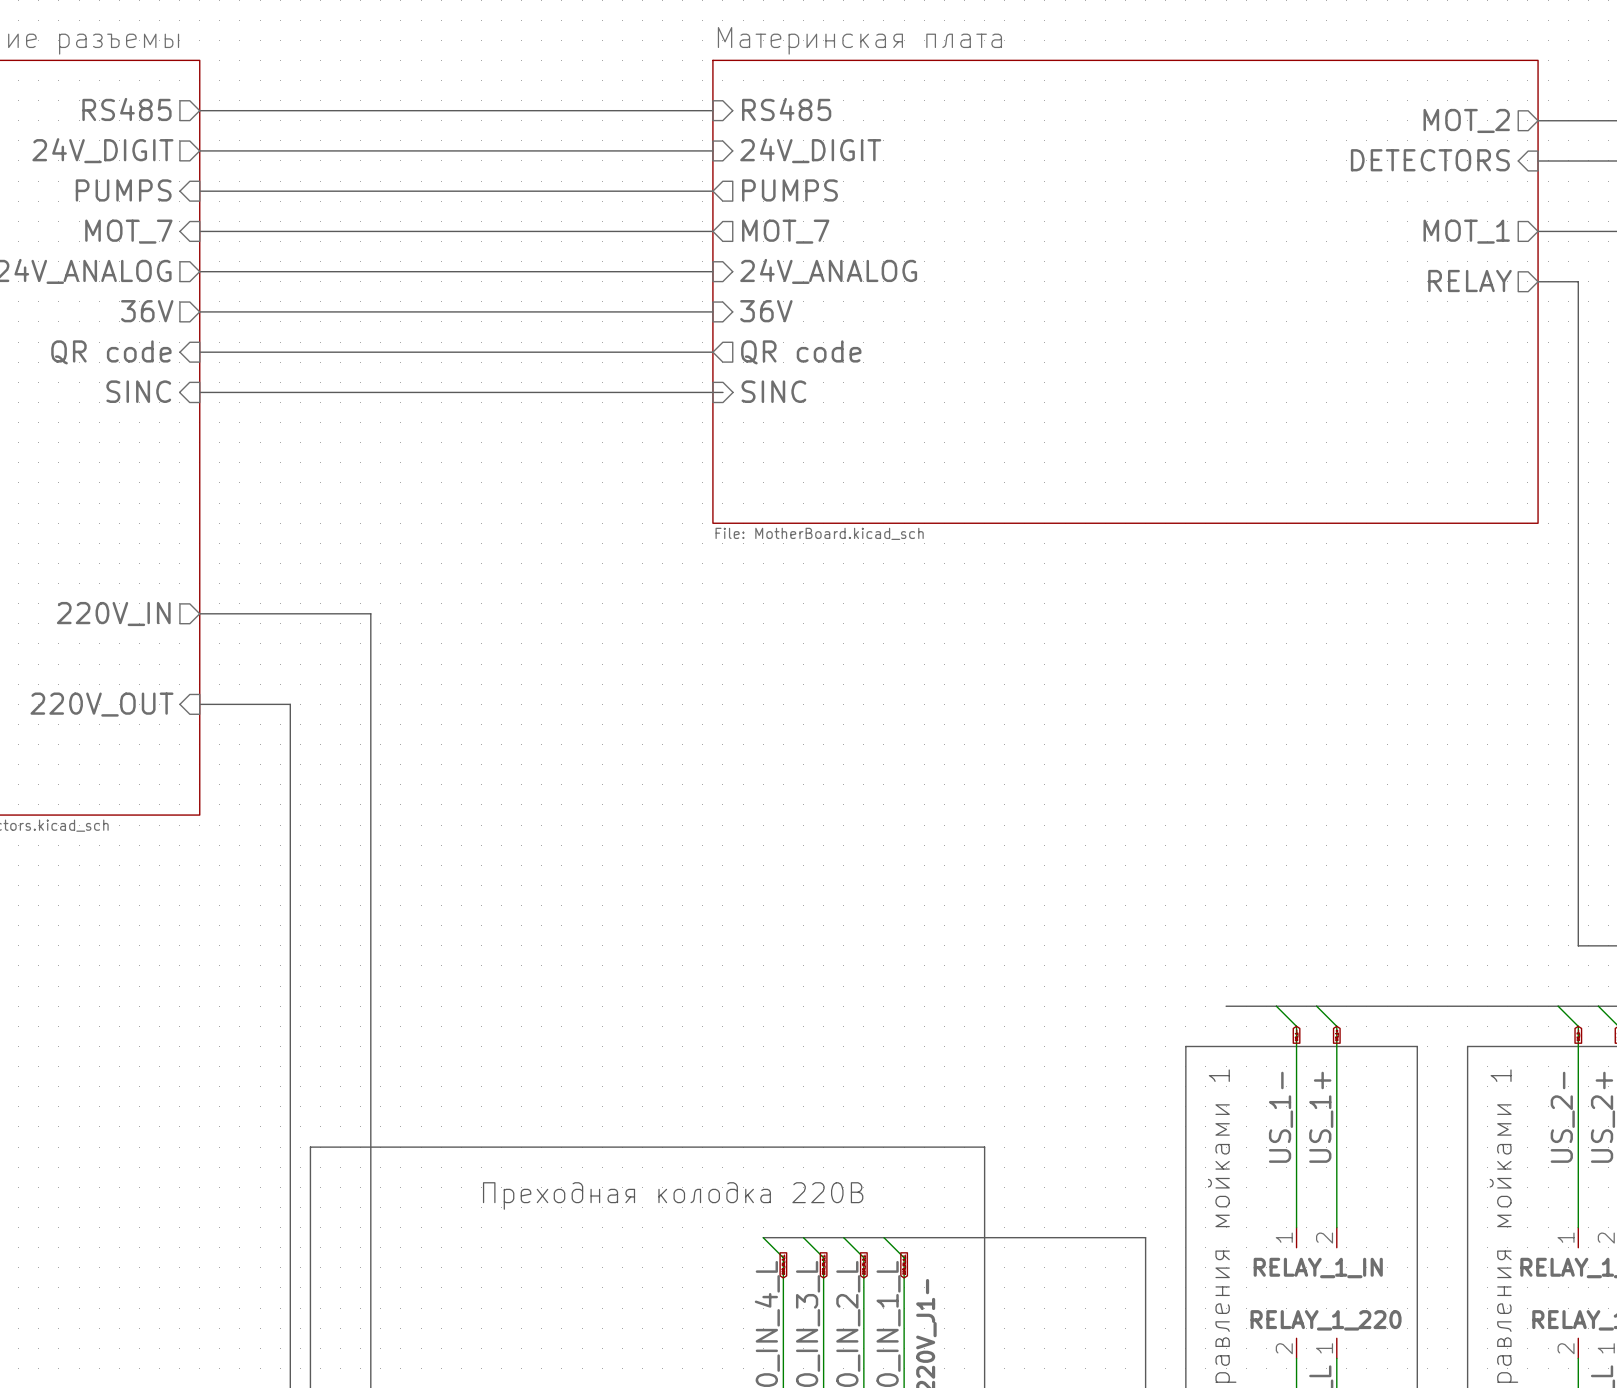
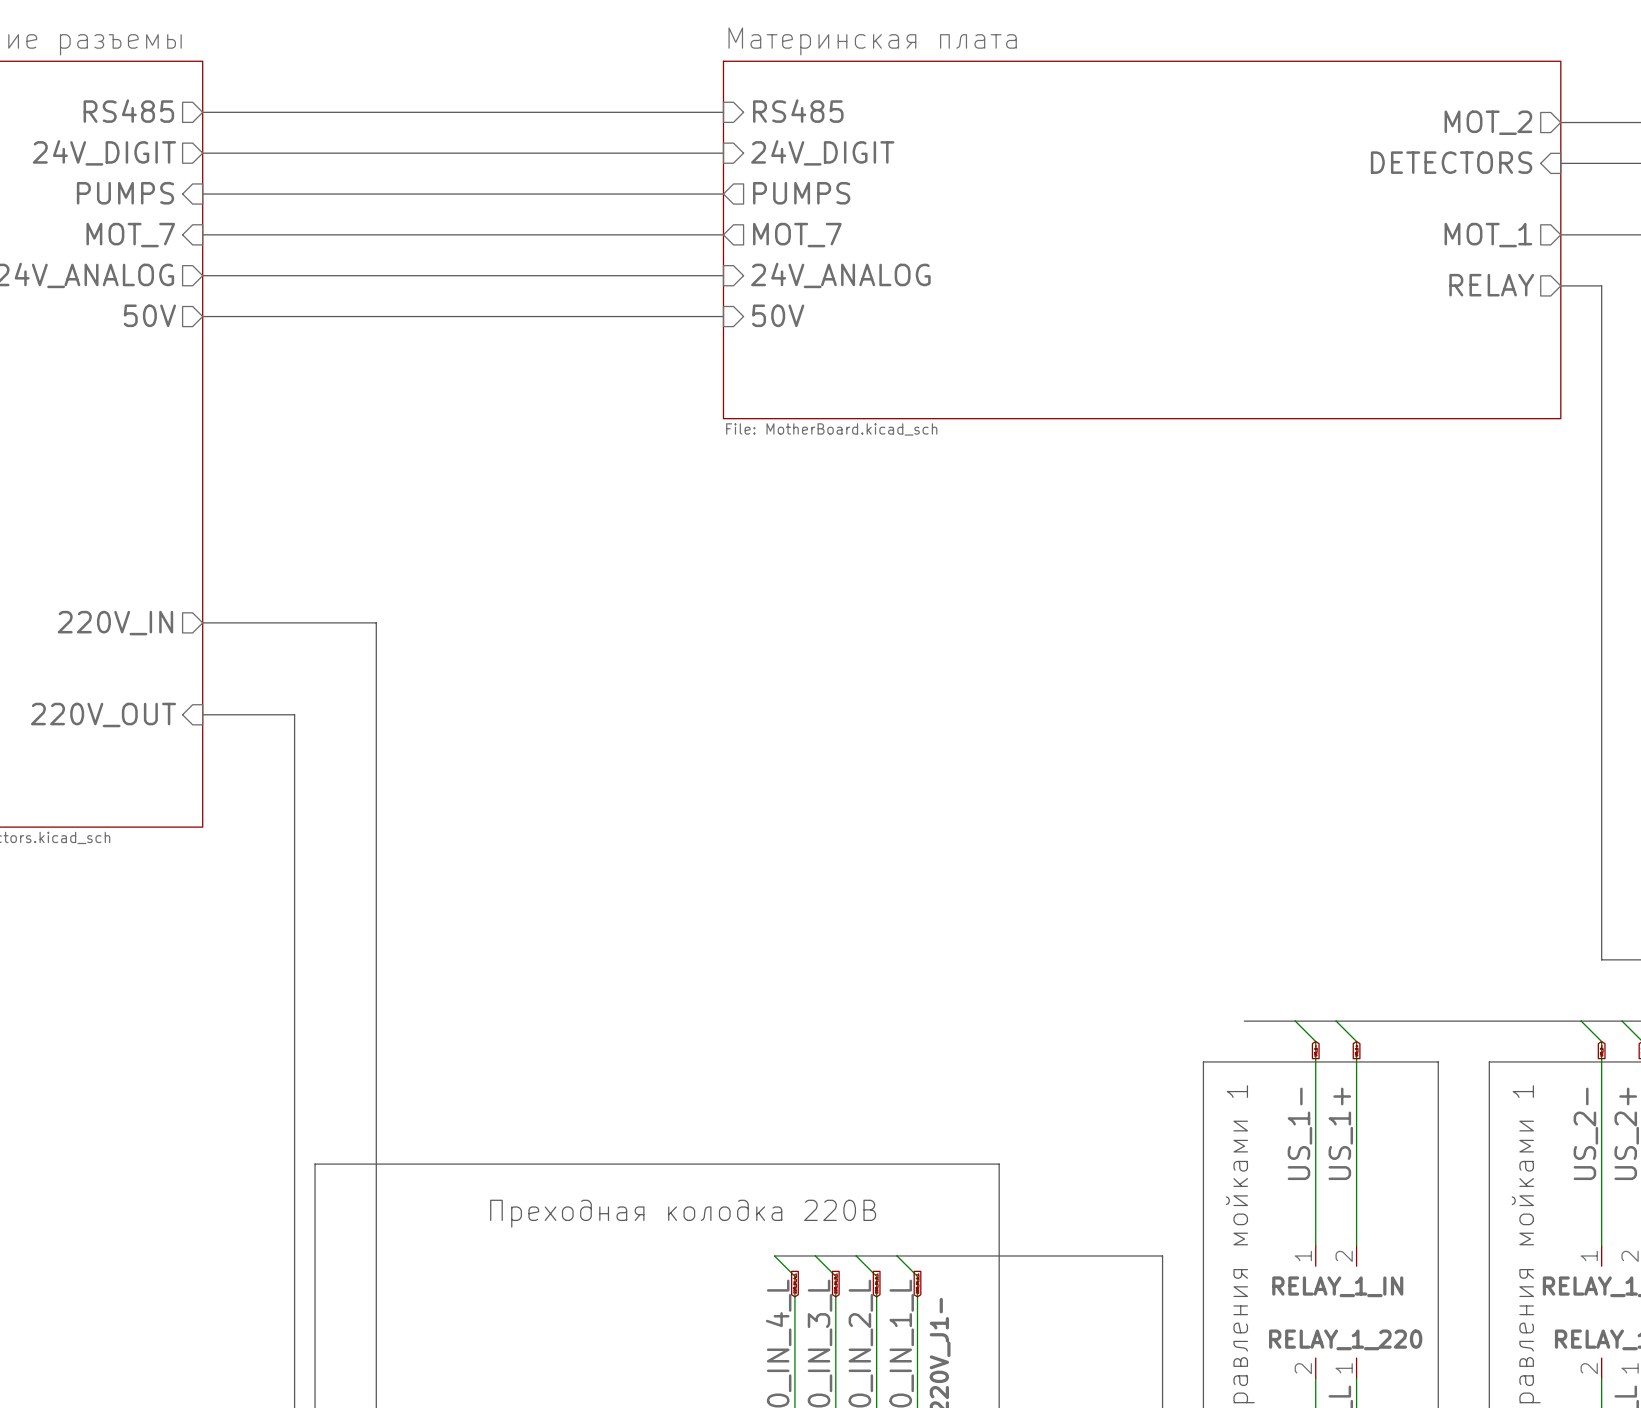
sheet Материнская плата: none -> File: MotherBoard.kicad_sch (1142, 239)
sheet Материнская плата: File: MotherBoard.kicad_sch (1125, 291) -> none
sheet pin: 36V (147, 311) -> 50V (149, 315)
sheet pin: 36V (766, 311) -> 50V (778, 315)
sheet pin: QR code (111, 352) -> none
bus: (199, 352) (712, 352) -> none
sheet pin: QR code (801, 352) -> none
sheet pin: SINC (138, 391) -> none
sheet pin: SINC (773, 391) -> none
bus: (199, 392) (722, 392) -> none

